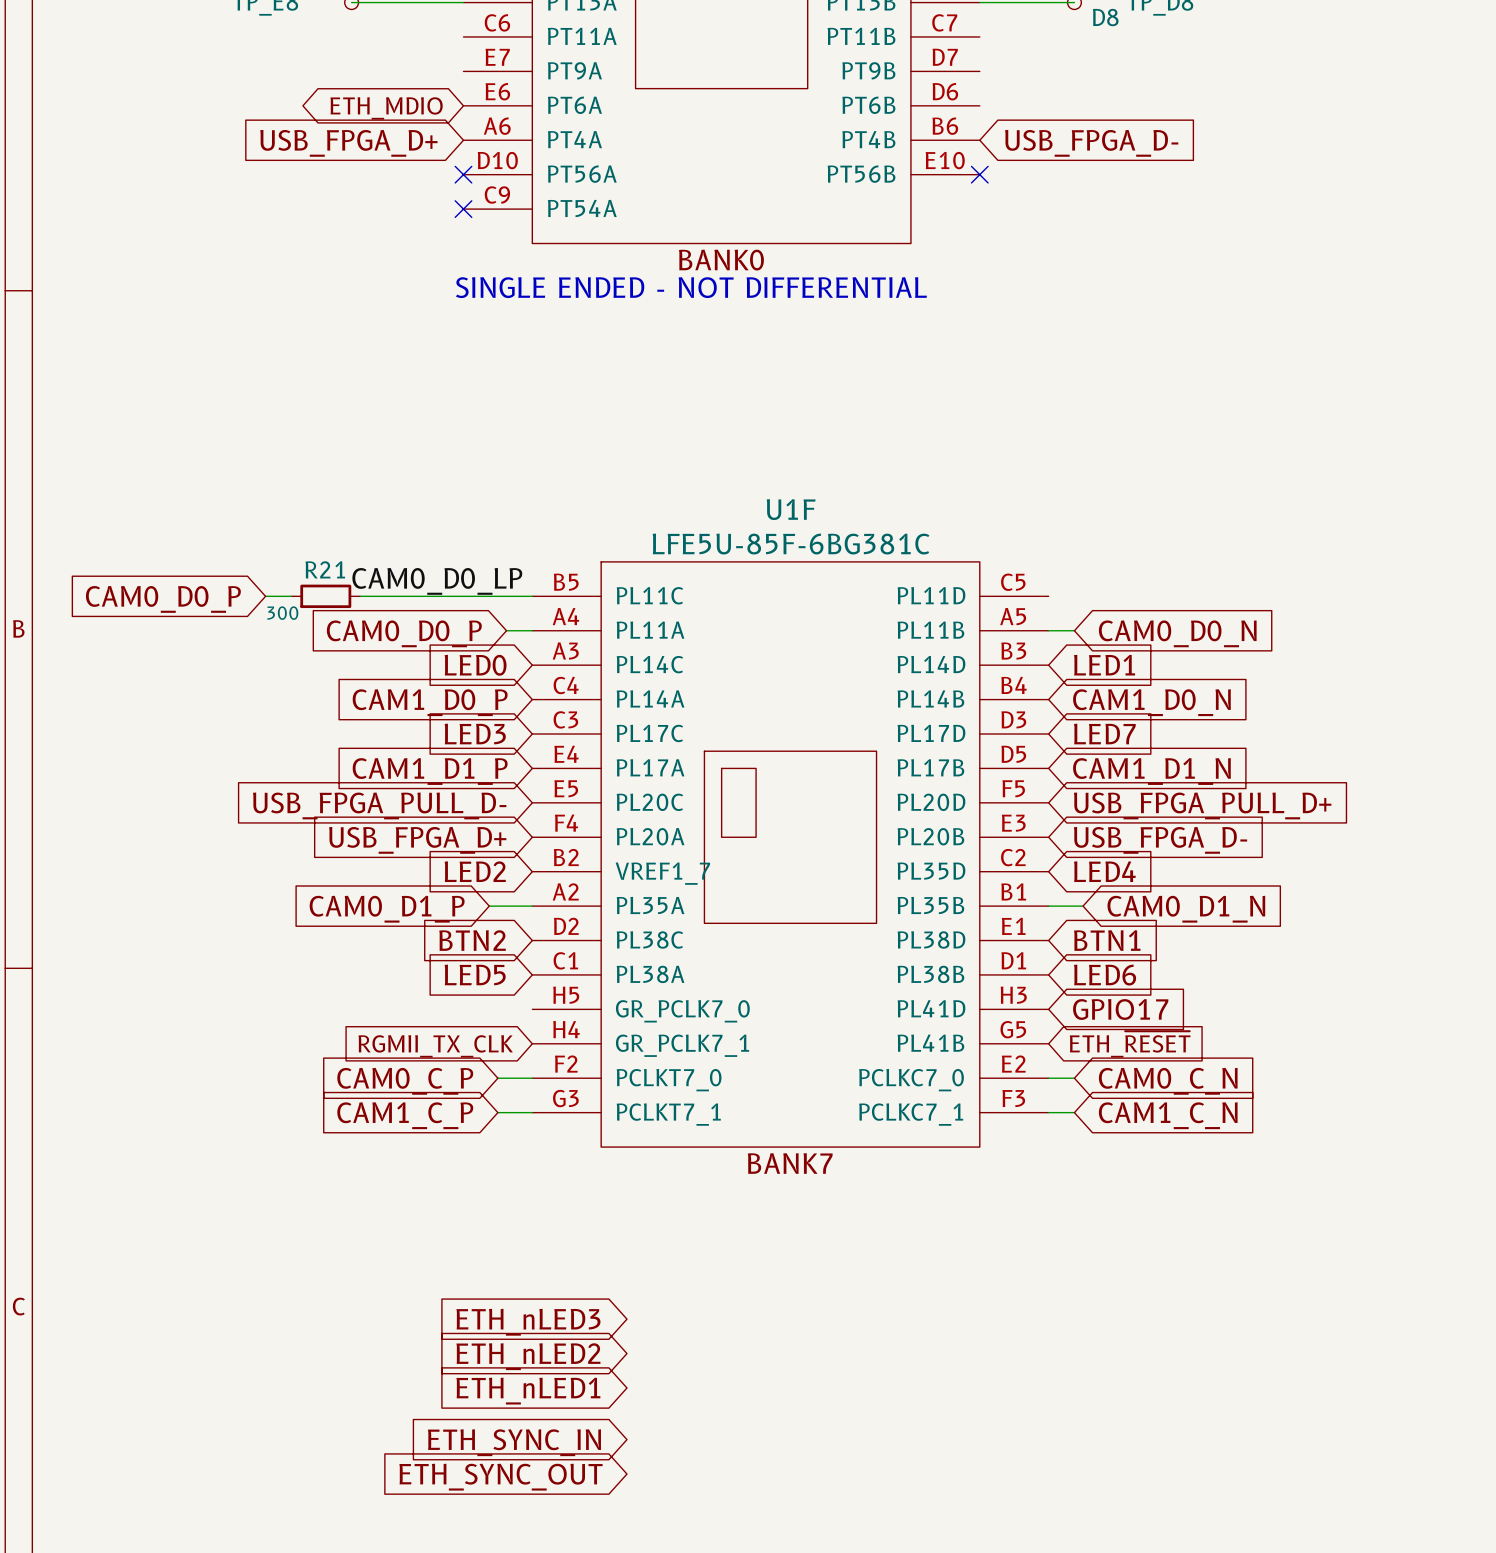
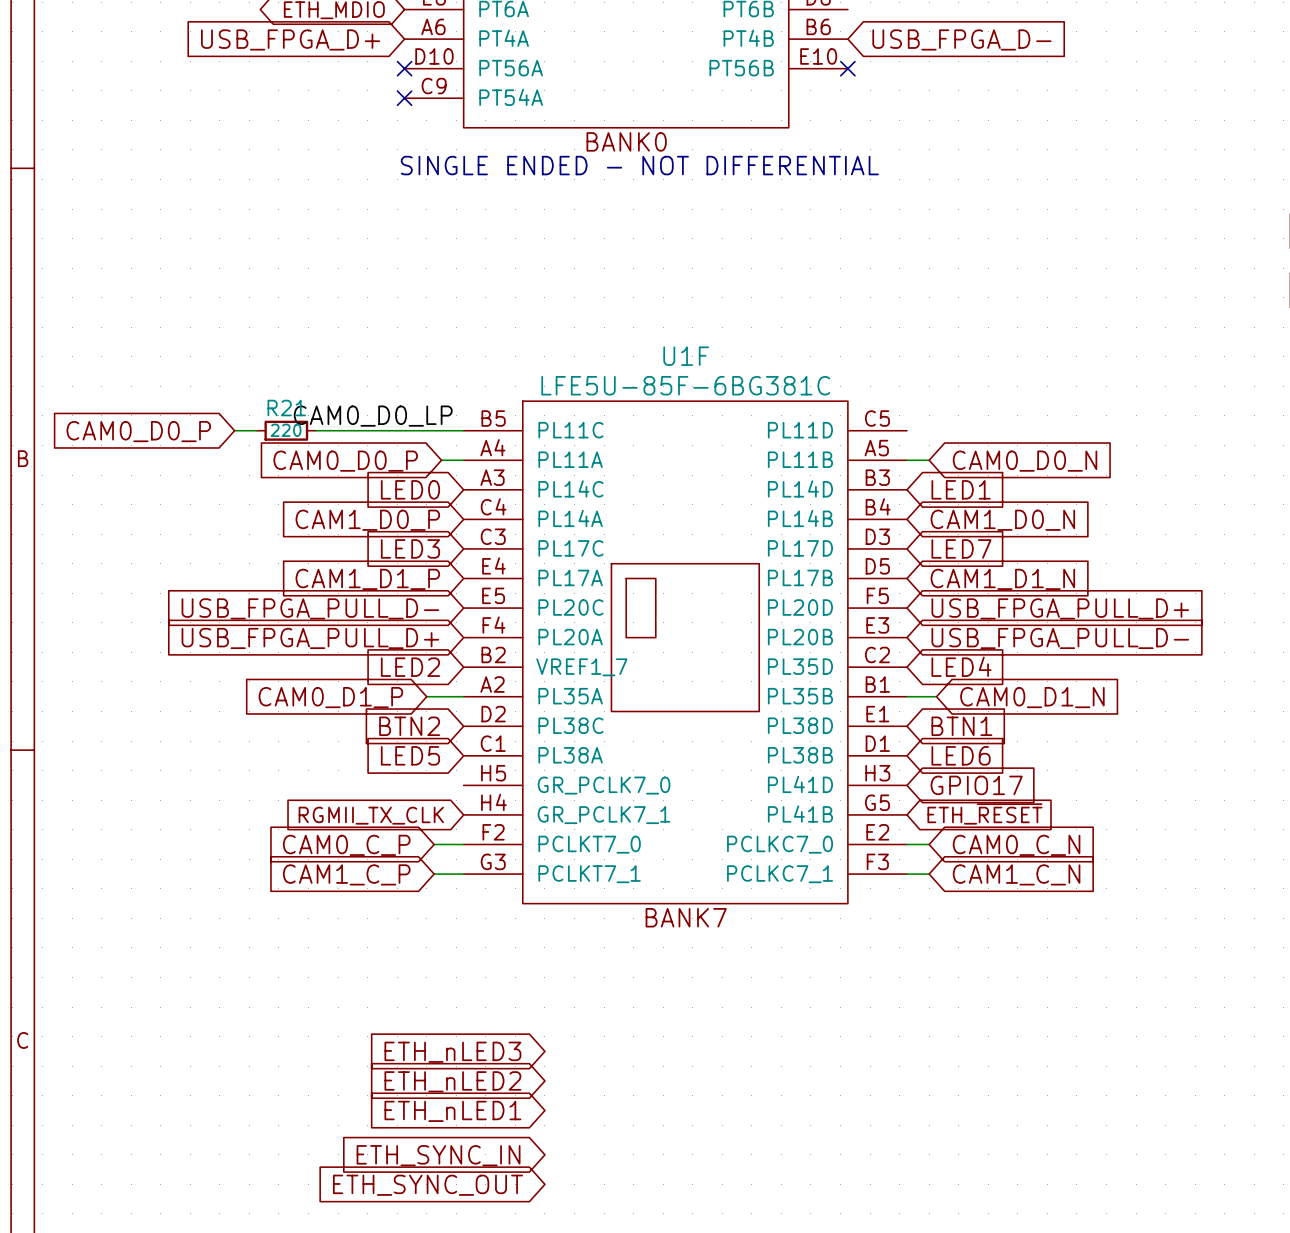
R21 value: 300 (282, 613) -> 220 (286, 430)
global label: USB_FPGA_D+ (417, 840) -> USB_FPGA_PULL_D+ (310, 638)
global label: USB_FPGA_D- (1160, 840) -> USB_FPGA_PULL_D- (1060, 638)

